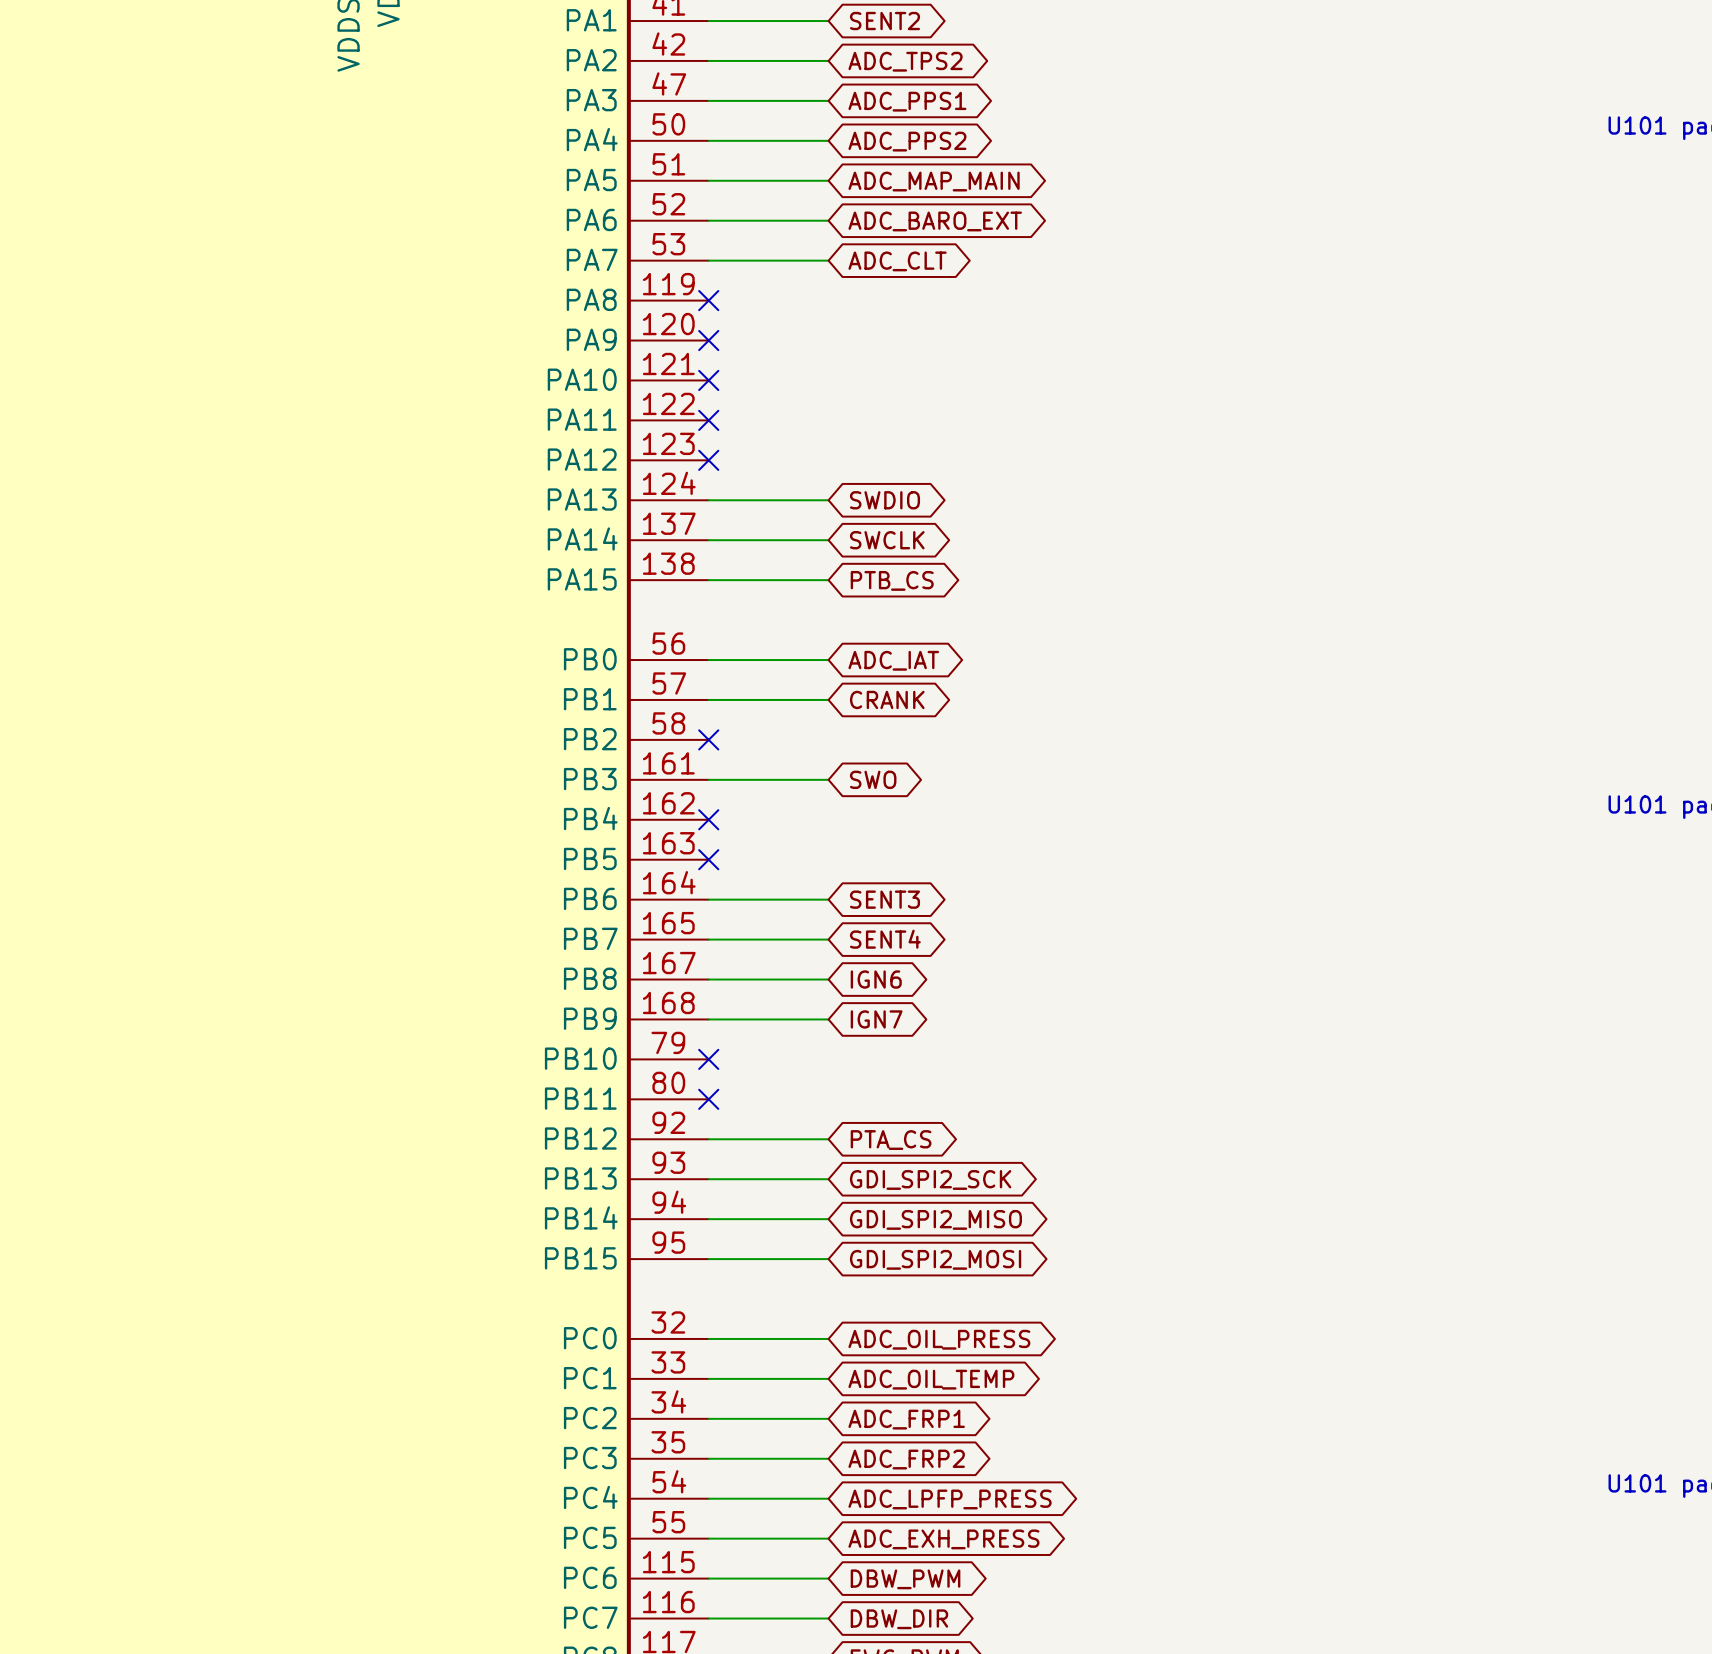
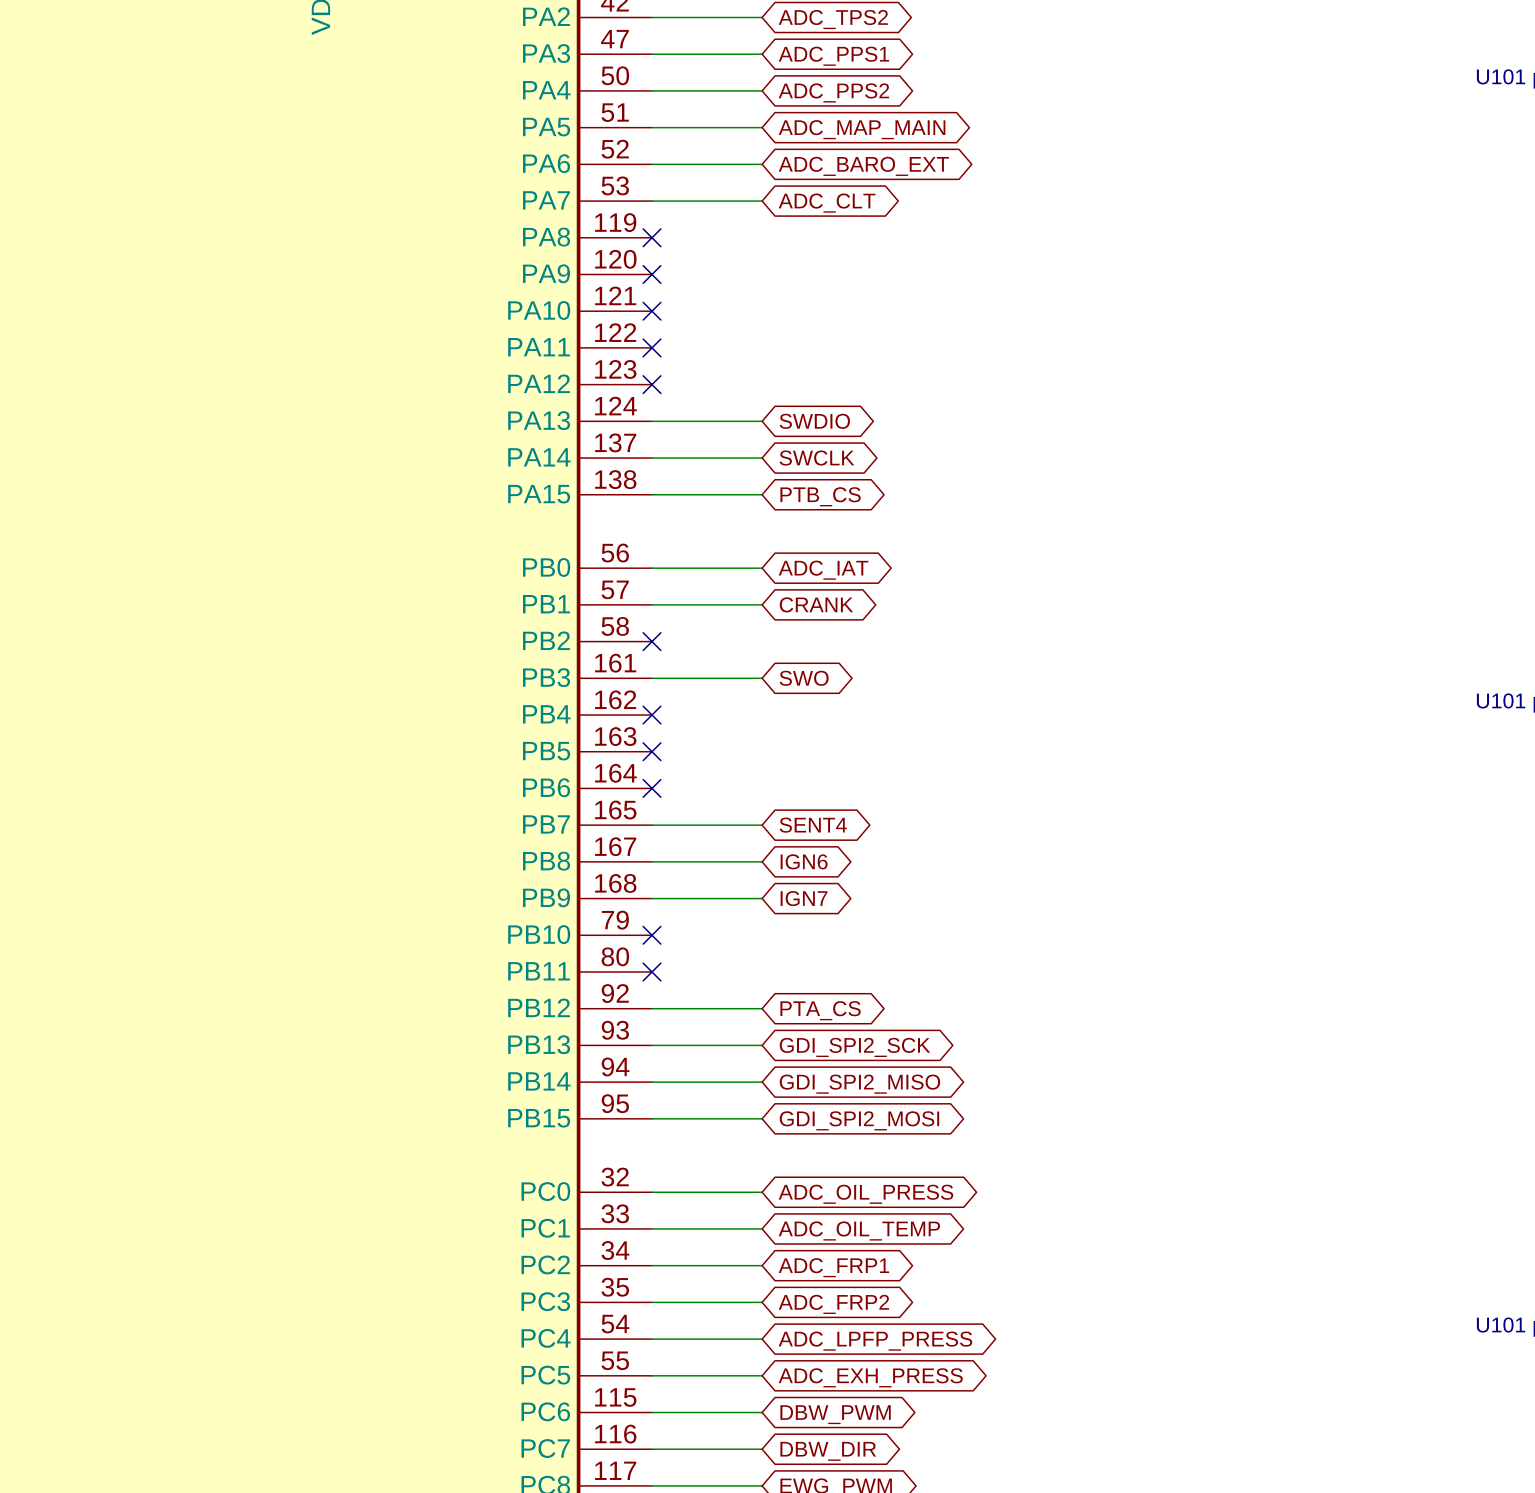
wire: (708, 899) (828, 899) -> none
no-connect mark: none -> (652, 788)
global label: SENT3 (884, 899) -> none

